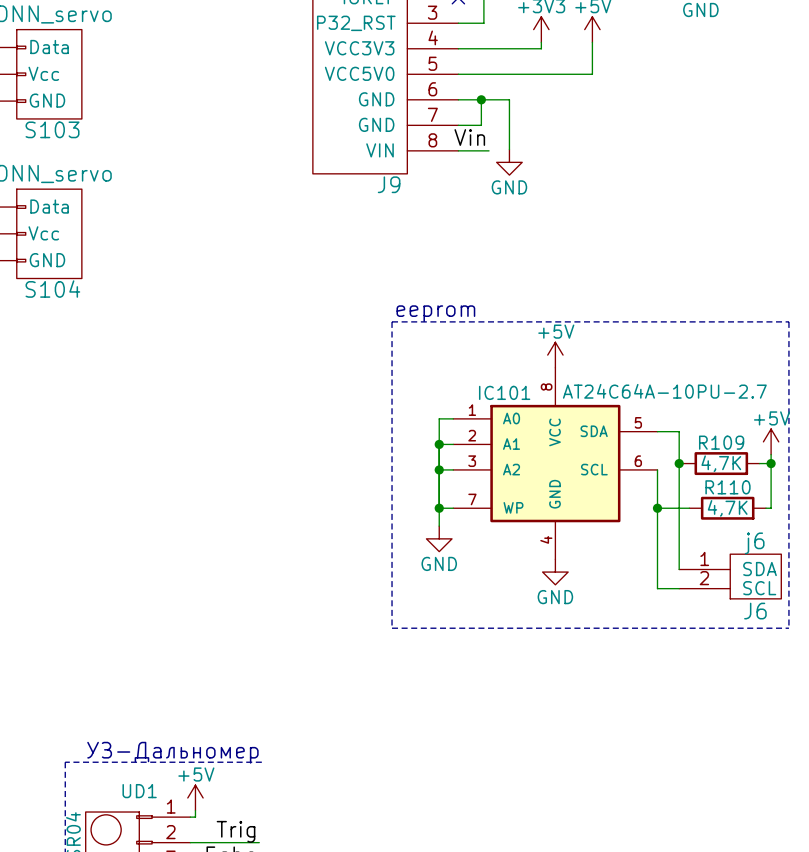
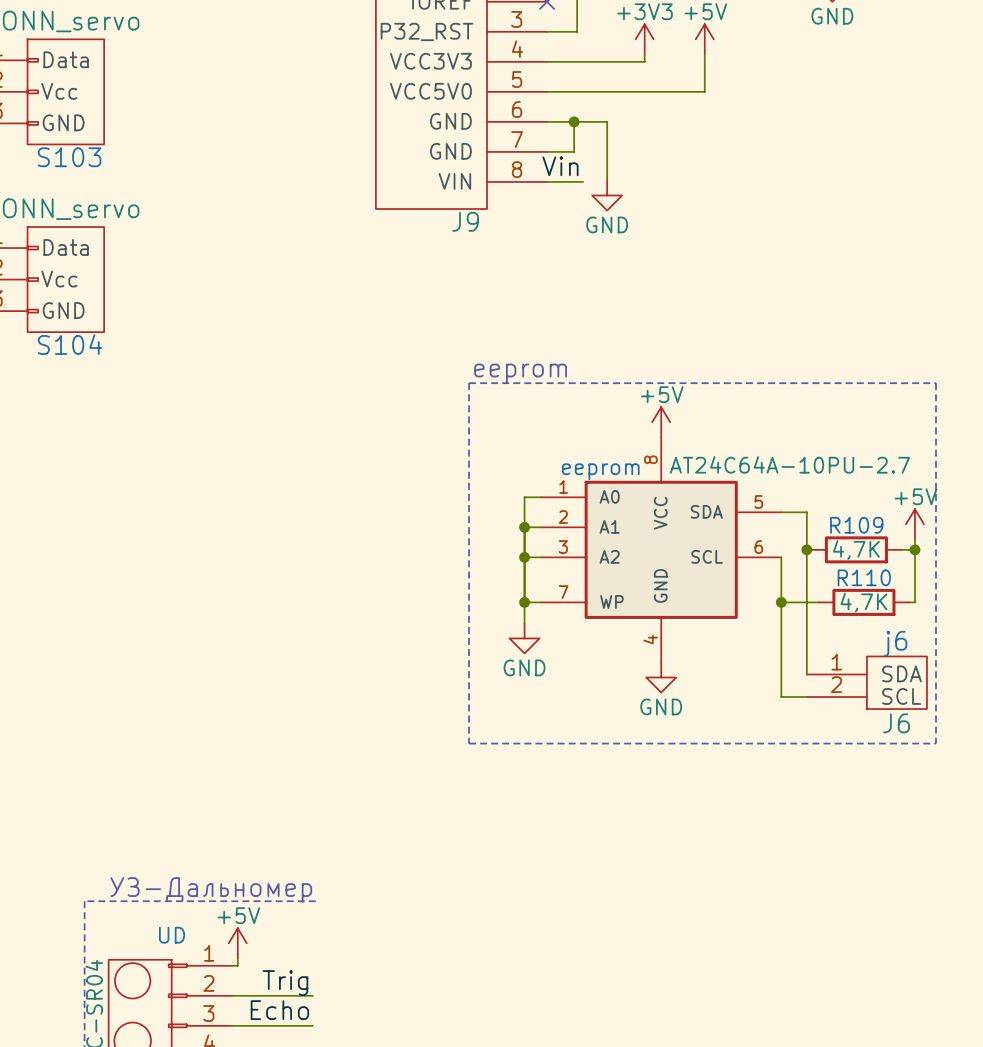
IC101 name: IC101 (504, 392) -> eeprom (600, 471)
UD1 name: UD1 (139, 791) -> UD (172, 935)

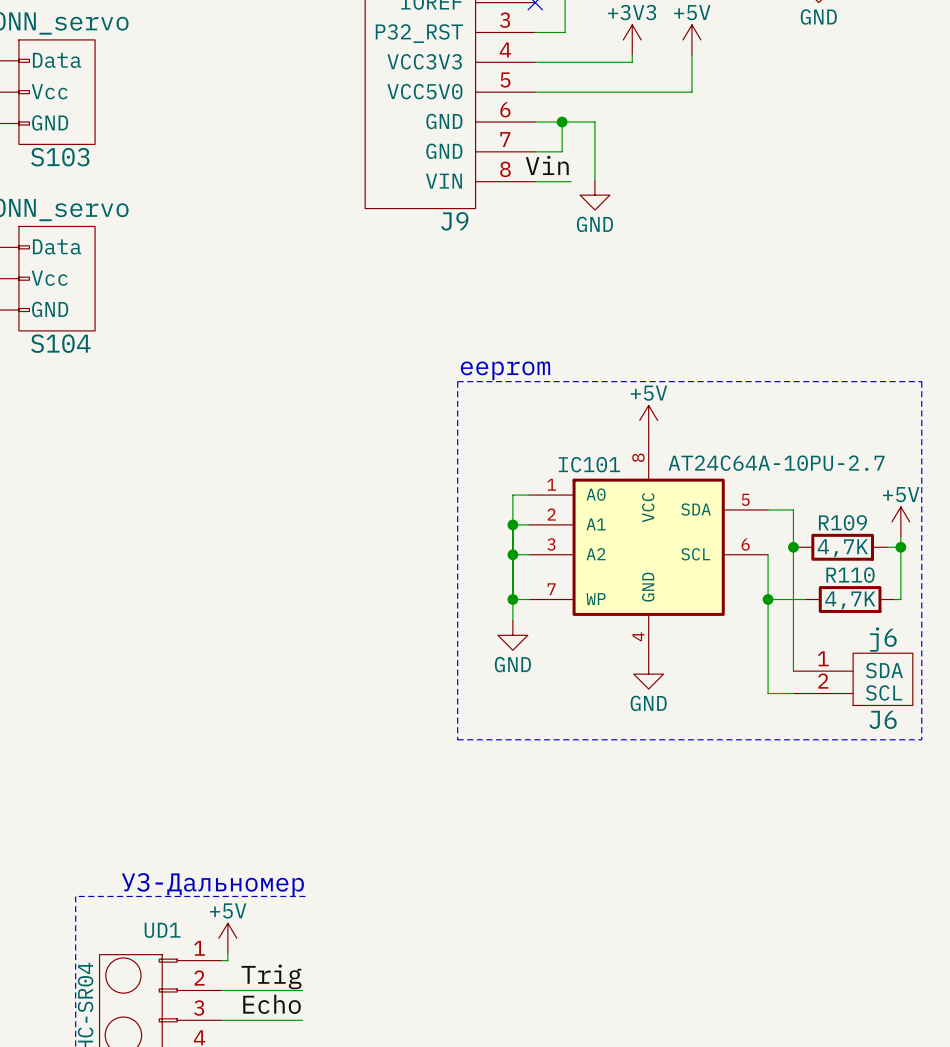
eeprom name: eeprom (600, 471) -> IC101 (589, 464)
UD name: UD (172, 935) -> UD1 (162, 930)

